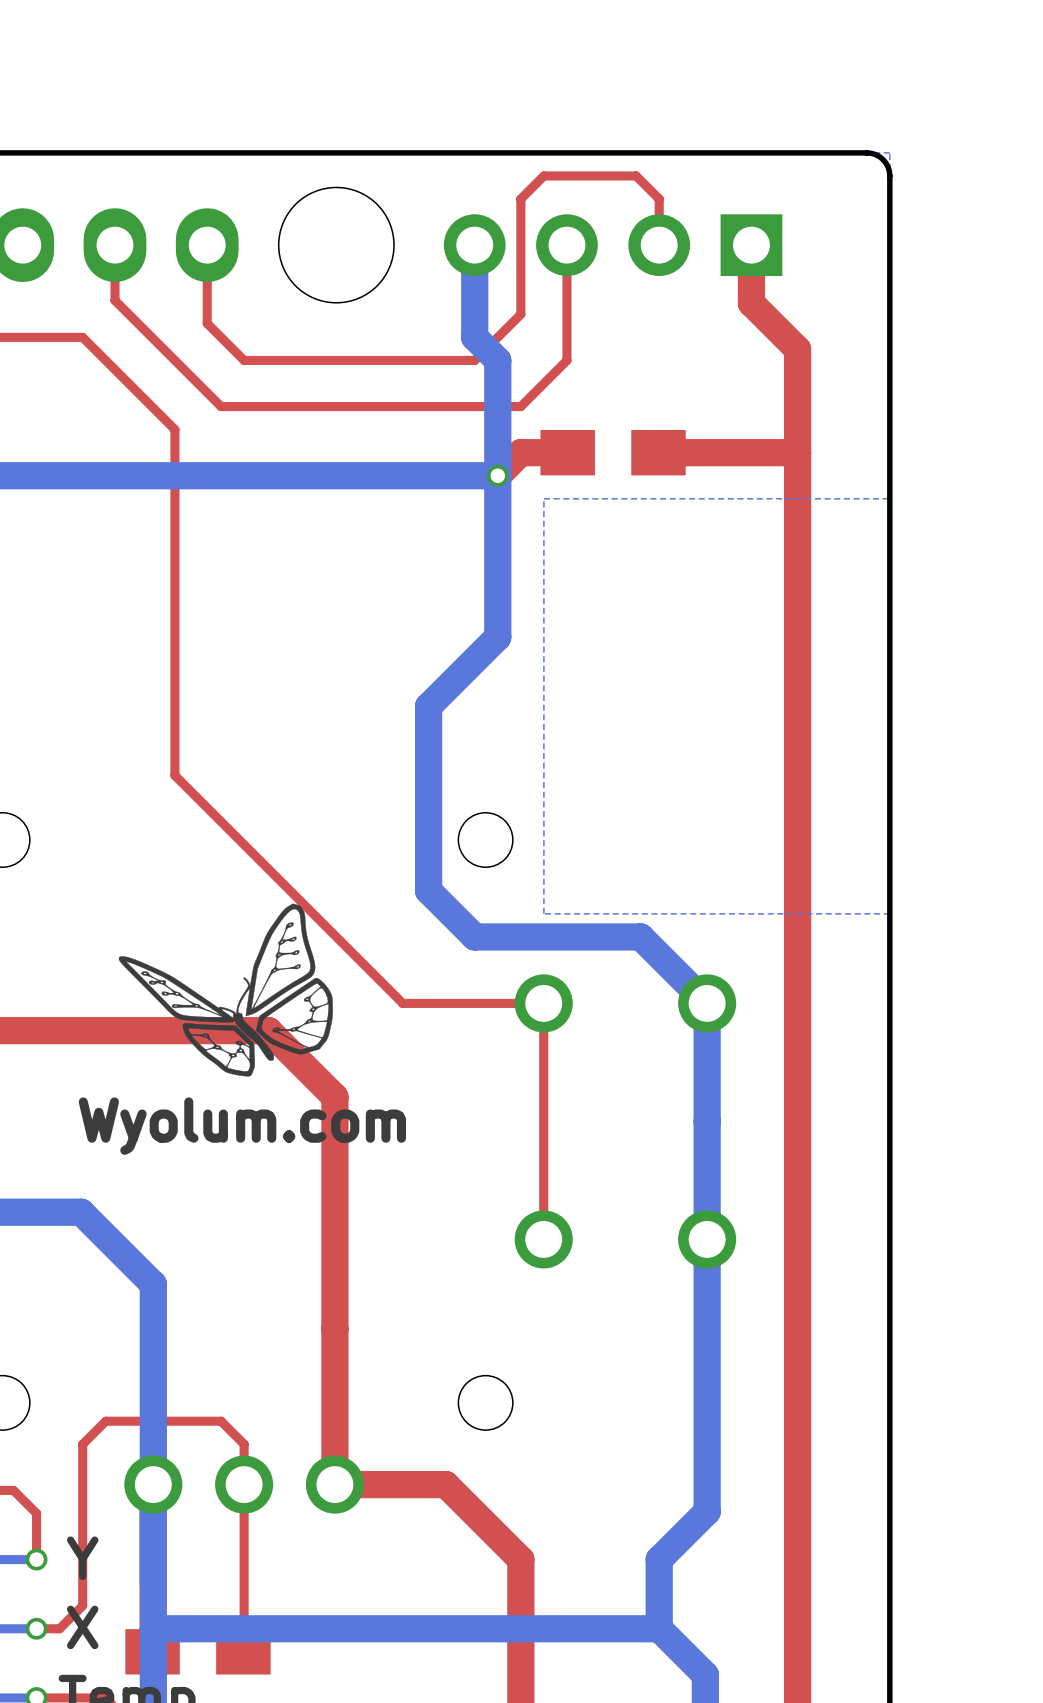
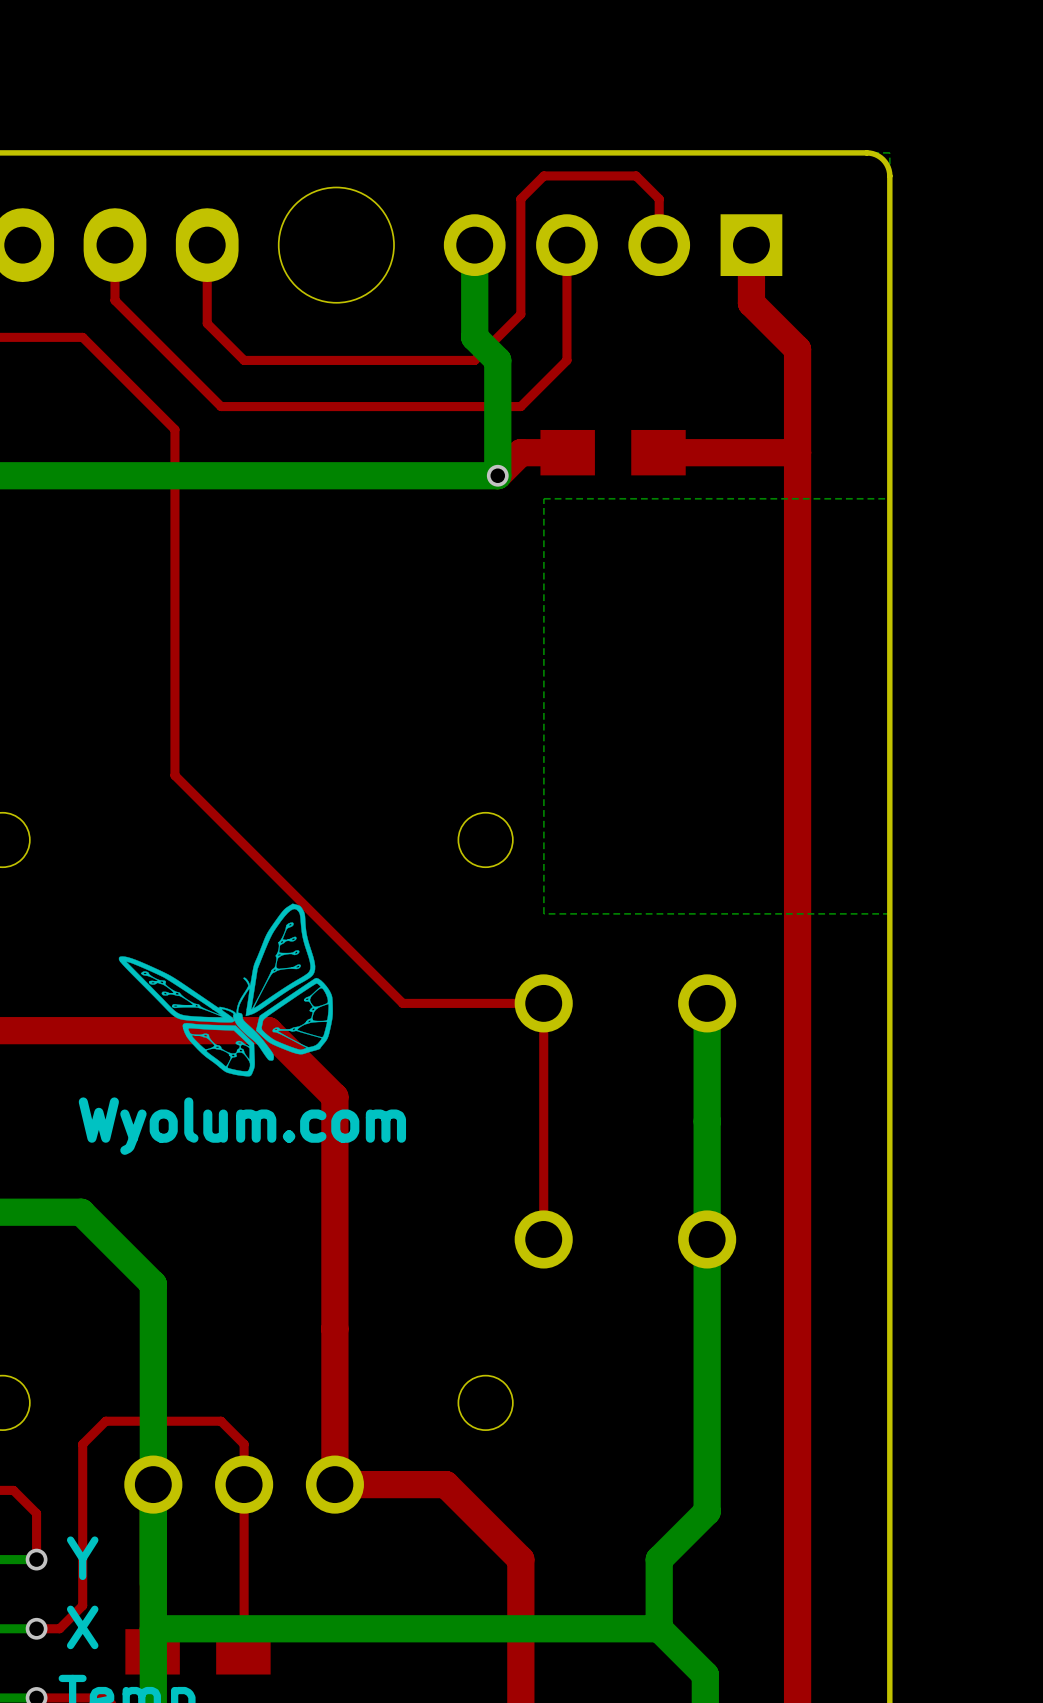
bottom track: (497, 475) (497, 637) (428, 706) (428, 890) (474, 936) (640, 936) (707, 1003) -> none

